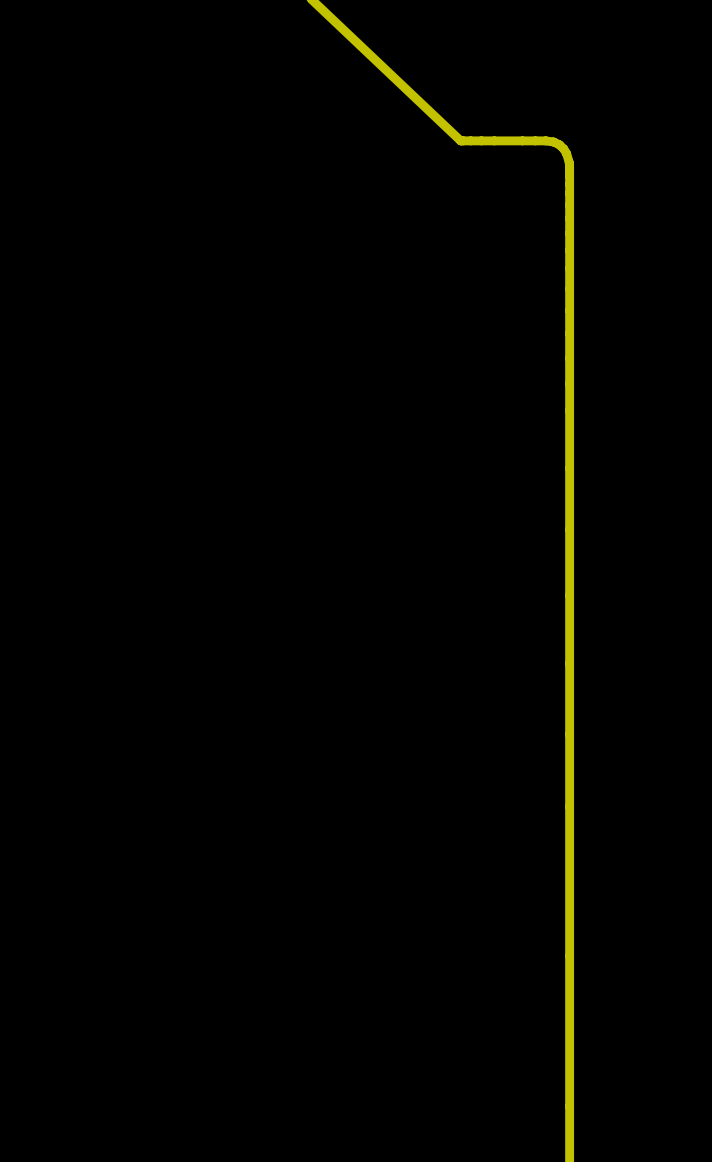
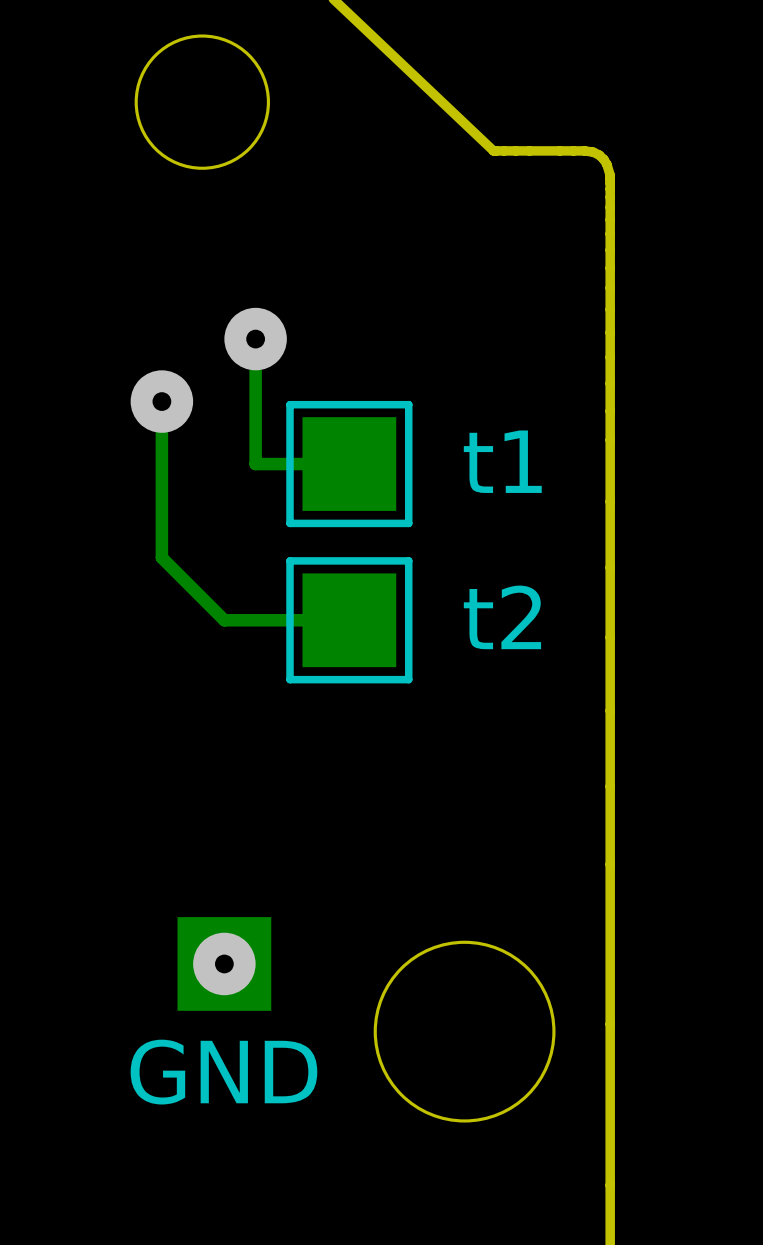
round board edge: none -> [134, 34, 270, 170]
track: none -> (255, 339) (255, 464) (349, 464)
via: none -> (255, 339)
track: none -> (161, 401) (161, 557) (224, 620) (349, 620)
via: none -> (161, 401)
t1: none -> (349, 464)
t2: none -> (349, 620)
round board edge: none -> [373, 940, 556, 1123]
part: none -> (224, 963)
via: none -> (224, 963)
text: none -> GND (223, 1072)

